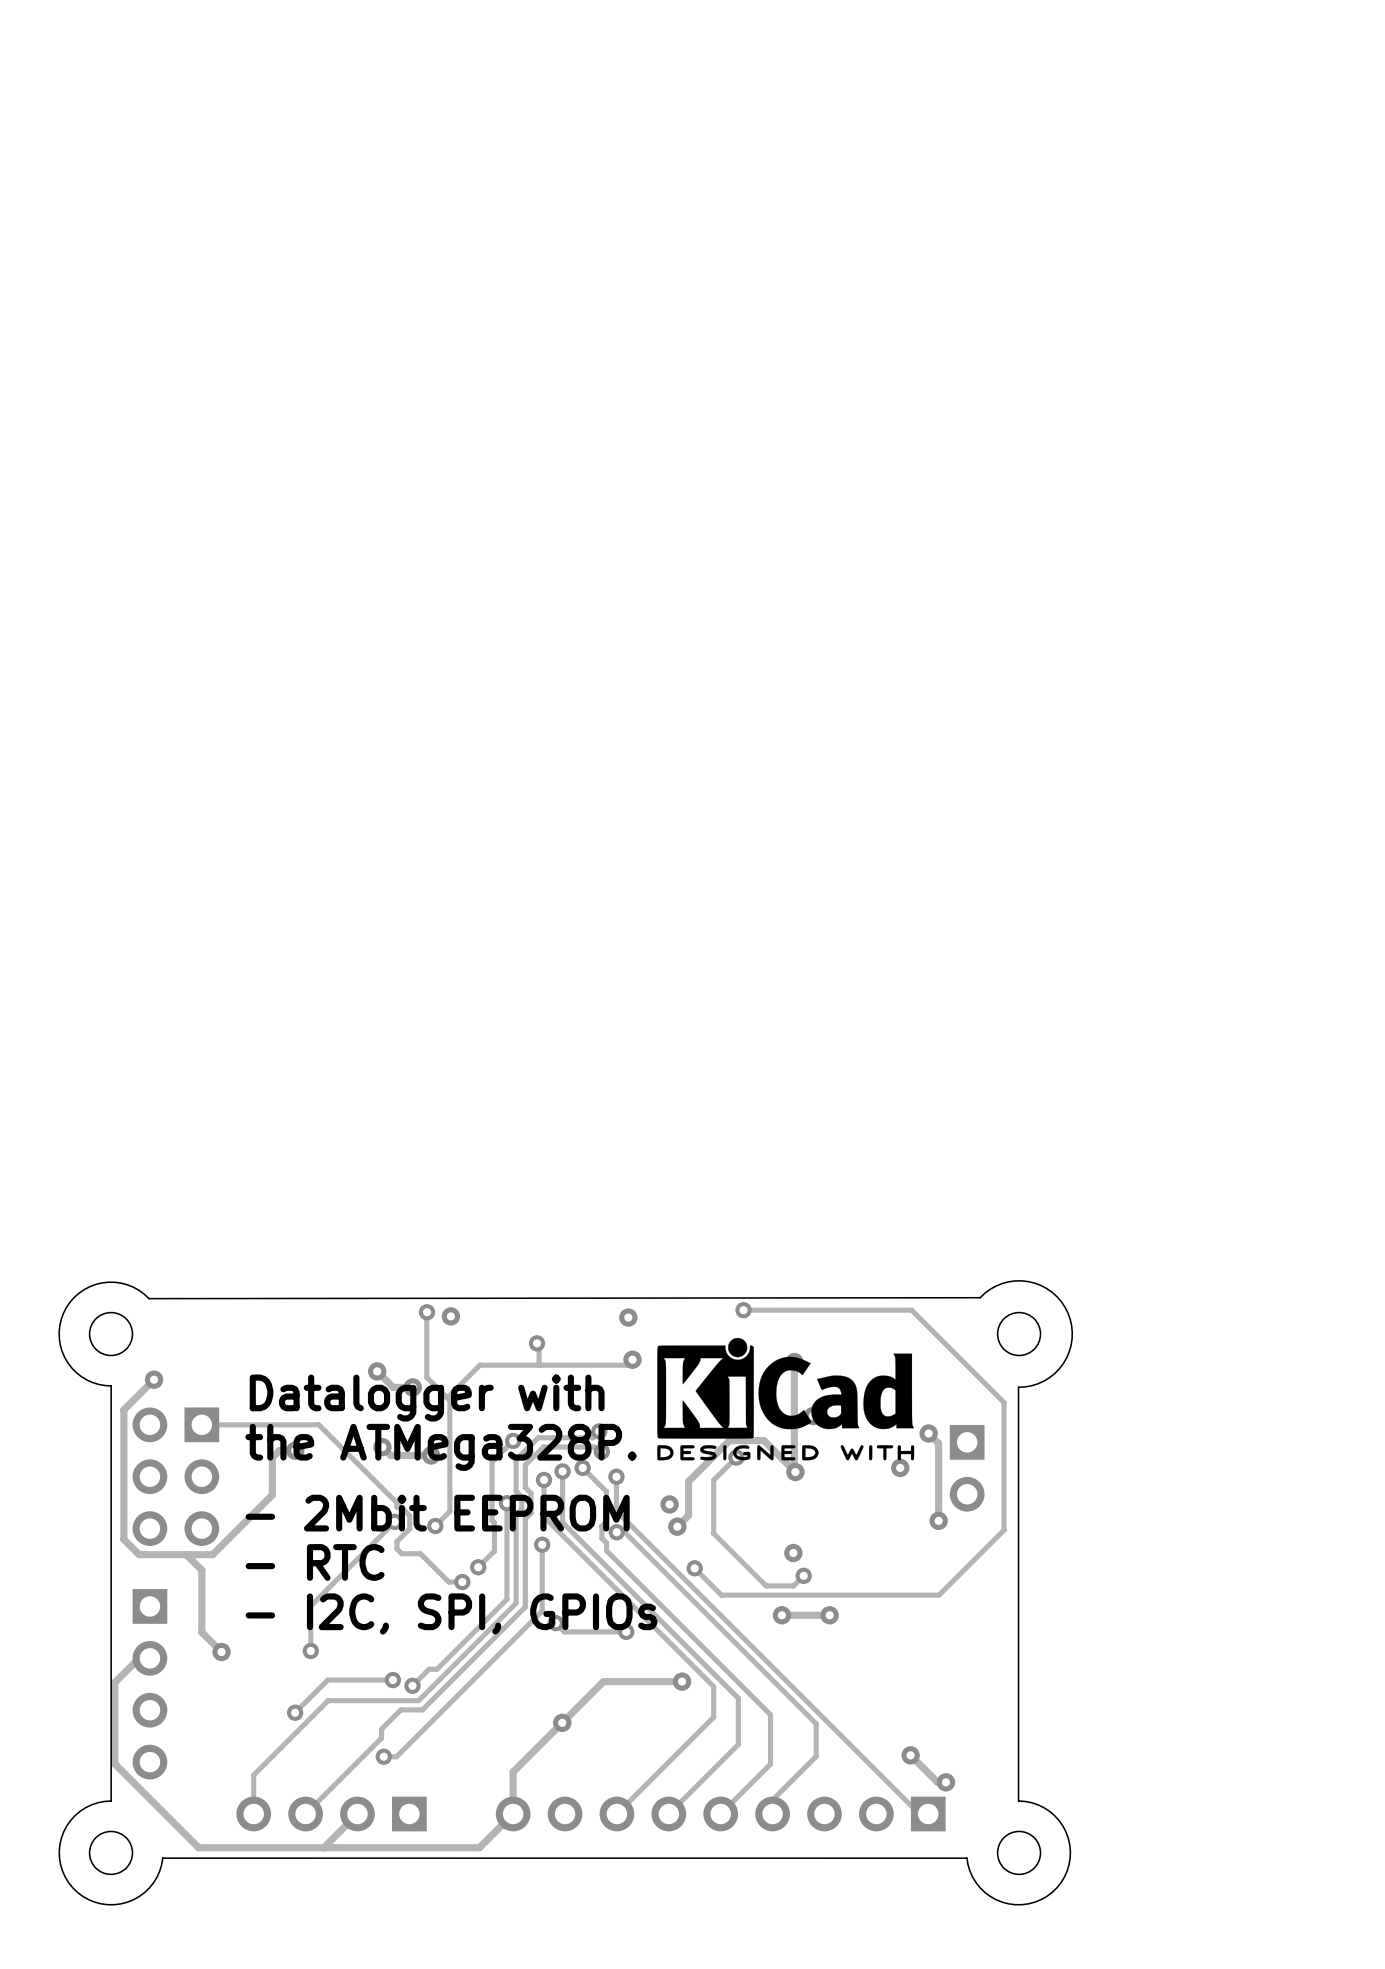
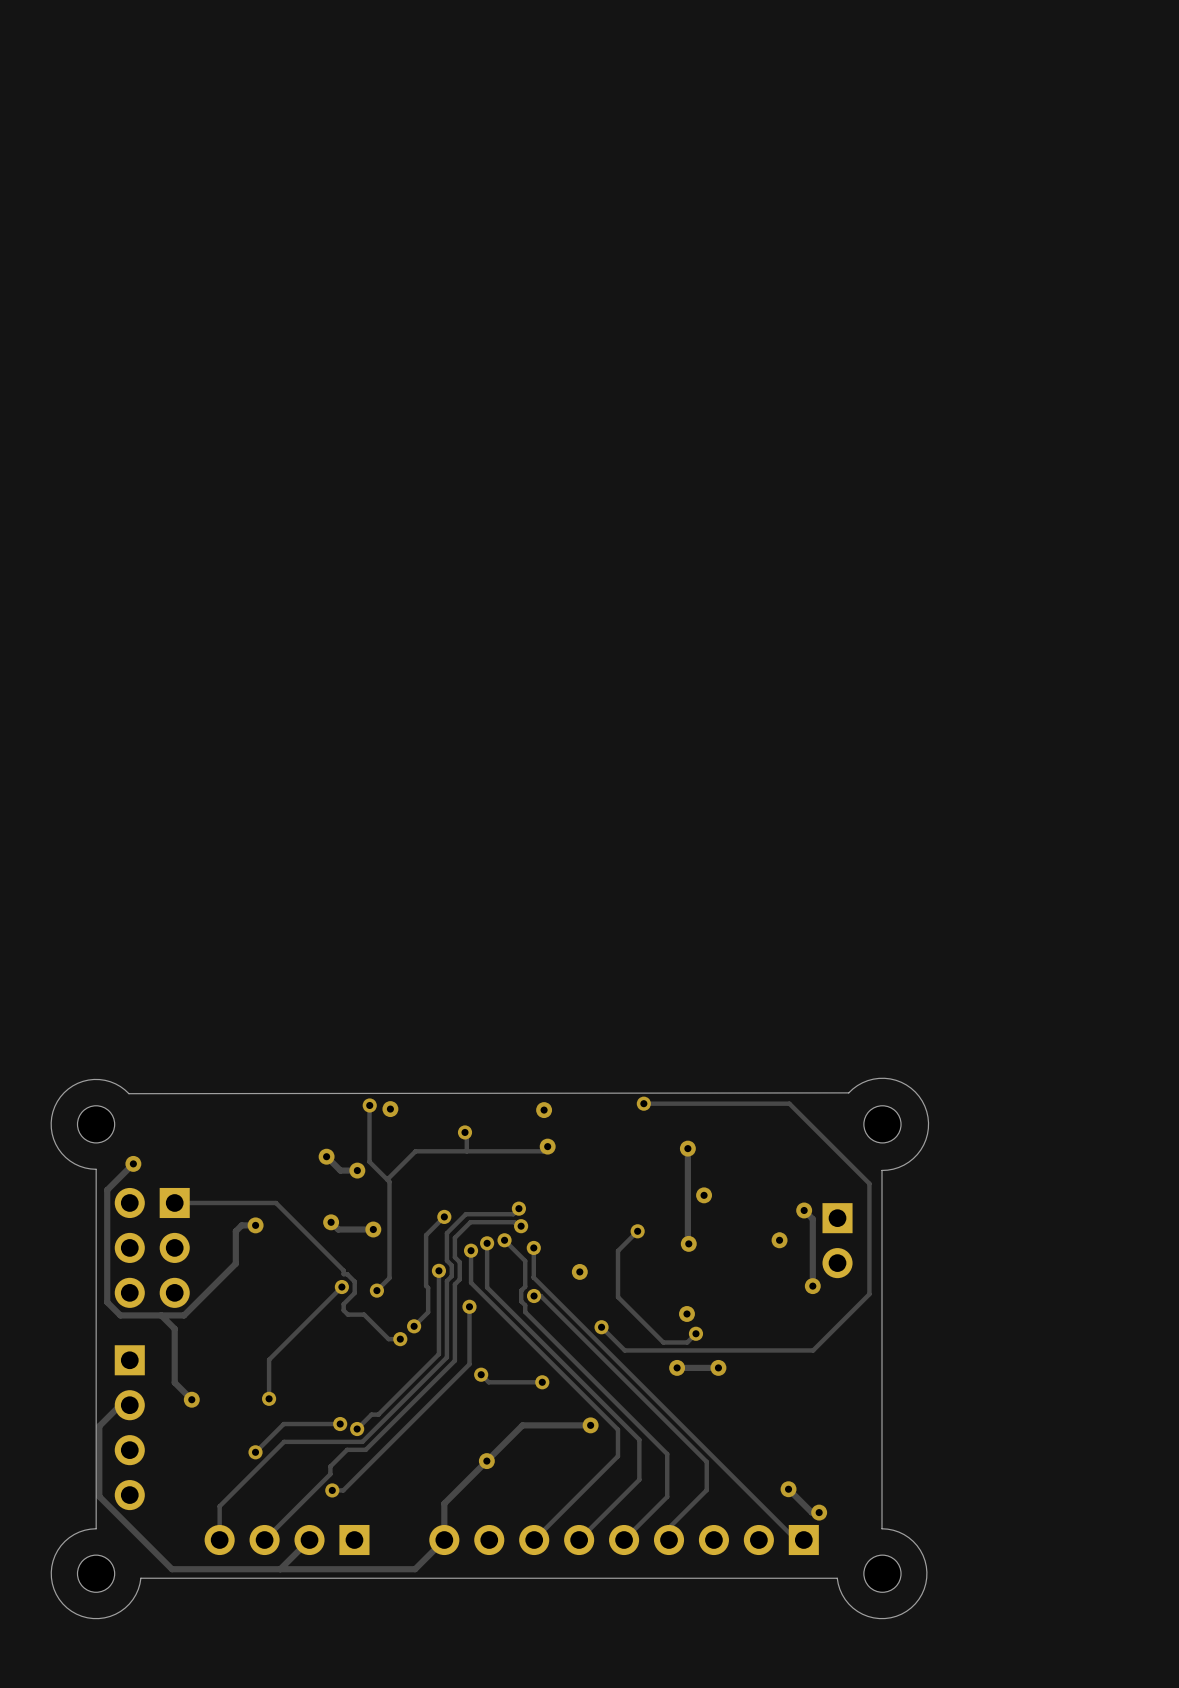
drawing: [657, 1337, 915, 1461] -> none
text: Datalogger with (427, 1398) -> none
text: the ATMega328P. (441, 1447) -> none
track: (794, 1471) (764, 1440) (729, 1440) (688, 1481) (688, 1515) (677, 1526) -> none
text: - 2Mbit EEPROM (437, 1513) -> none
via: (677, 1526) -> none
text: - RTC (315, 1562) -> none
text: - I2C, SPI, GPIOs (451, 1613) -> none

